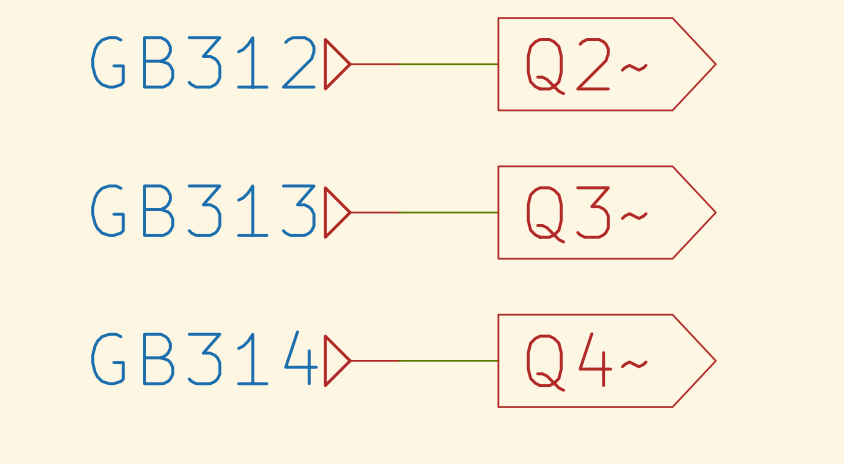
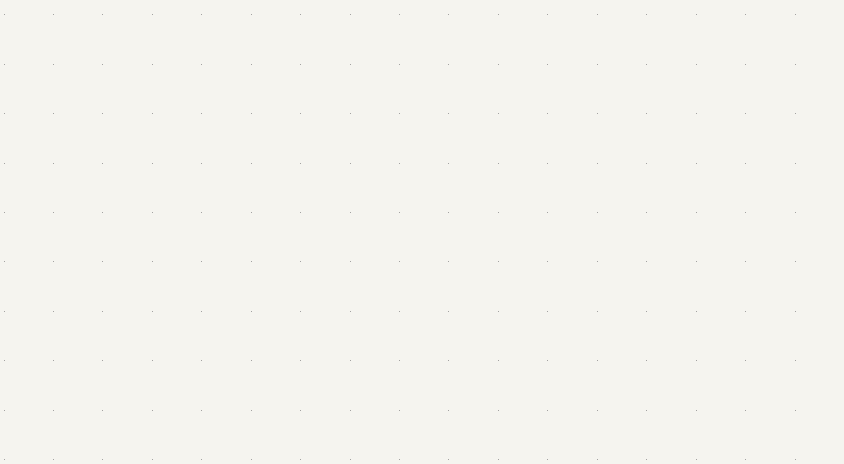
GB312: (361, 64) -> none
wire: (399, 64) (498, 64) -> none
global label: Q2~ (587, 66) -> none
GB313: (361, 212) -> none
wire: (399, 212) (498, 212) -> none
global label: Q3~ (587, 214) -> none
GB314: (361, 360) -> none
wire: (399, 360) (498, 360) -> none
global label: Q4~ (587, 362) -> none

